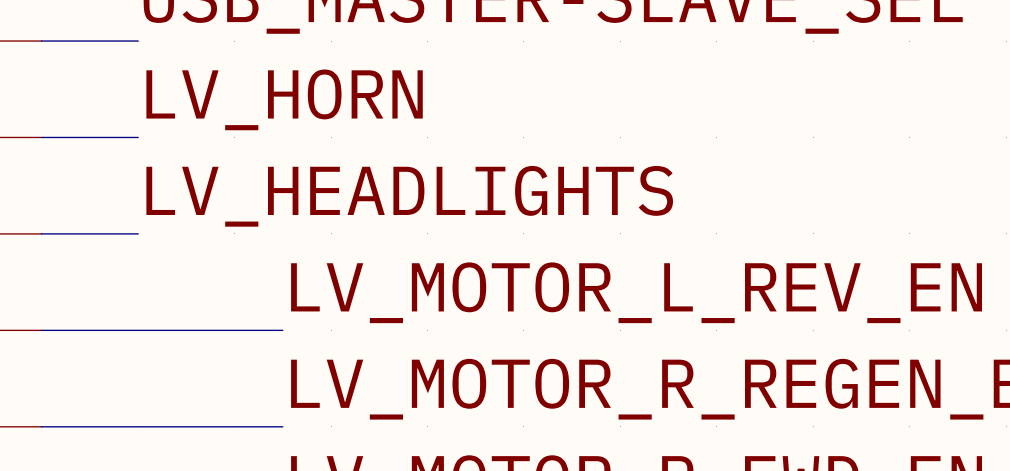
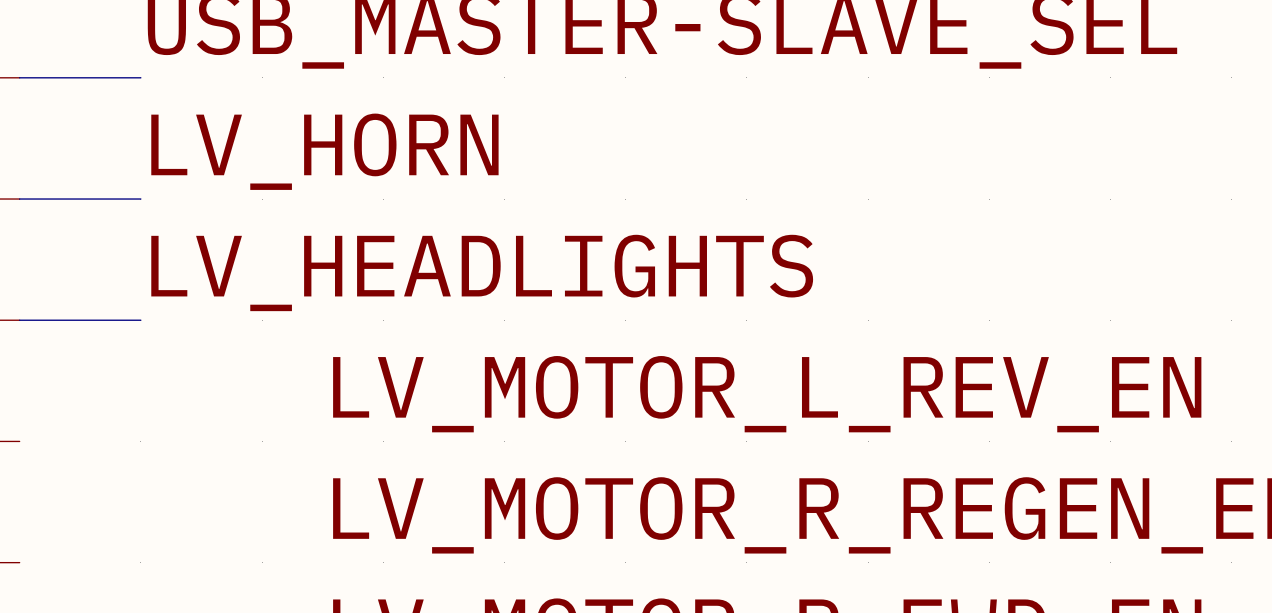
wire: (41, 330) (282, 330) -> none
wire: (41, 426) (282, 426) -> none

